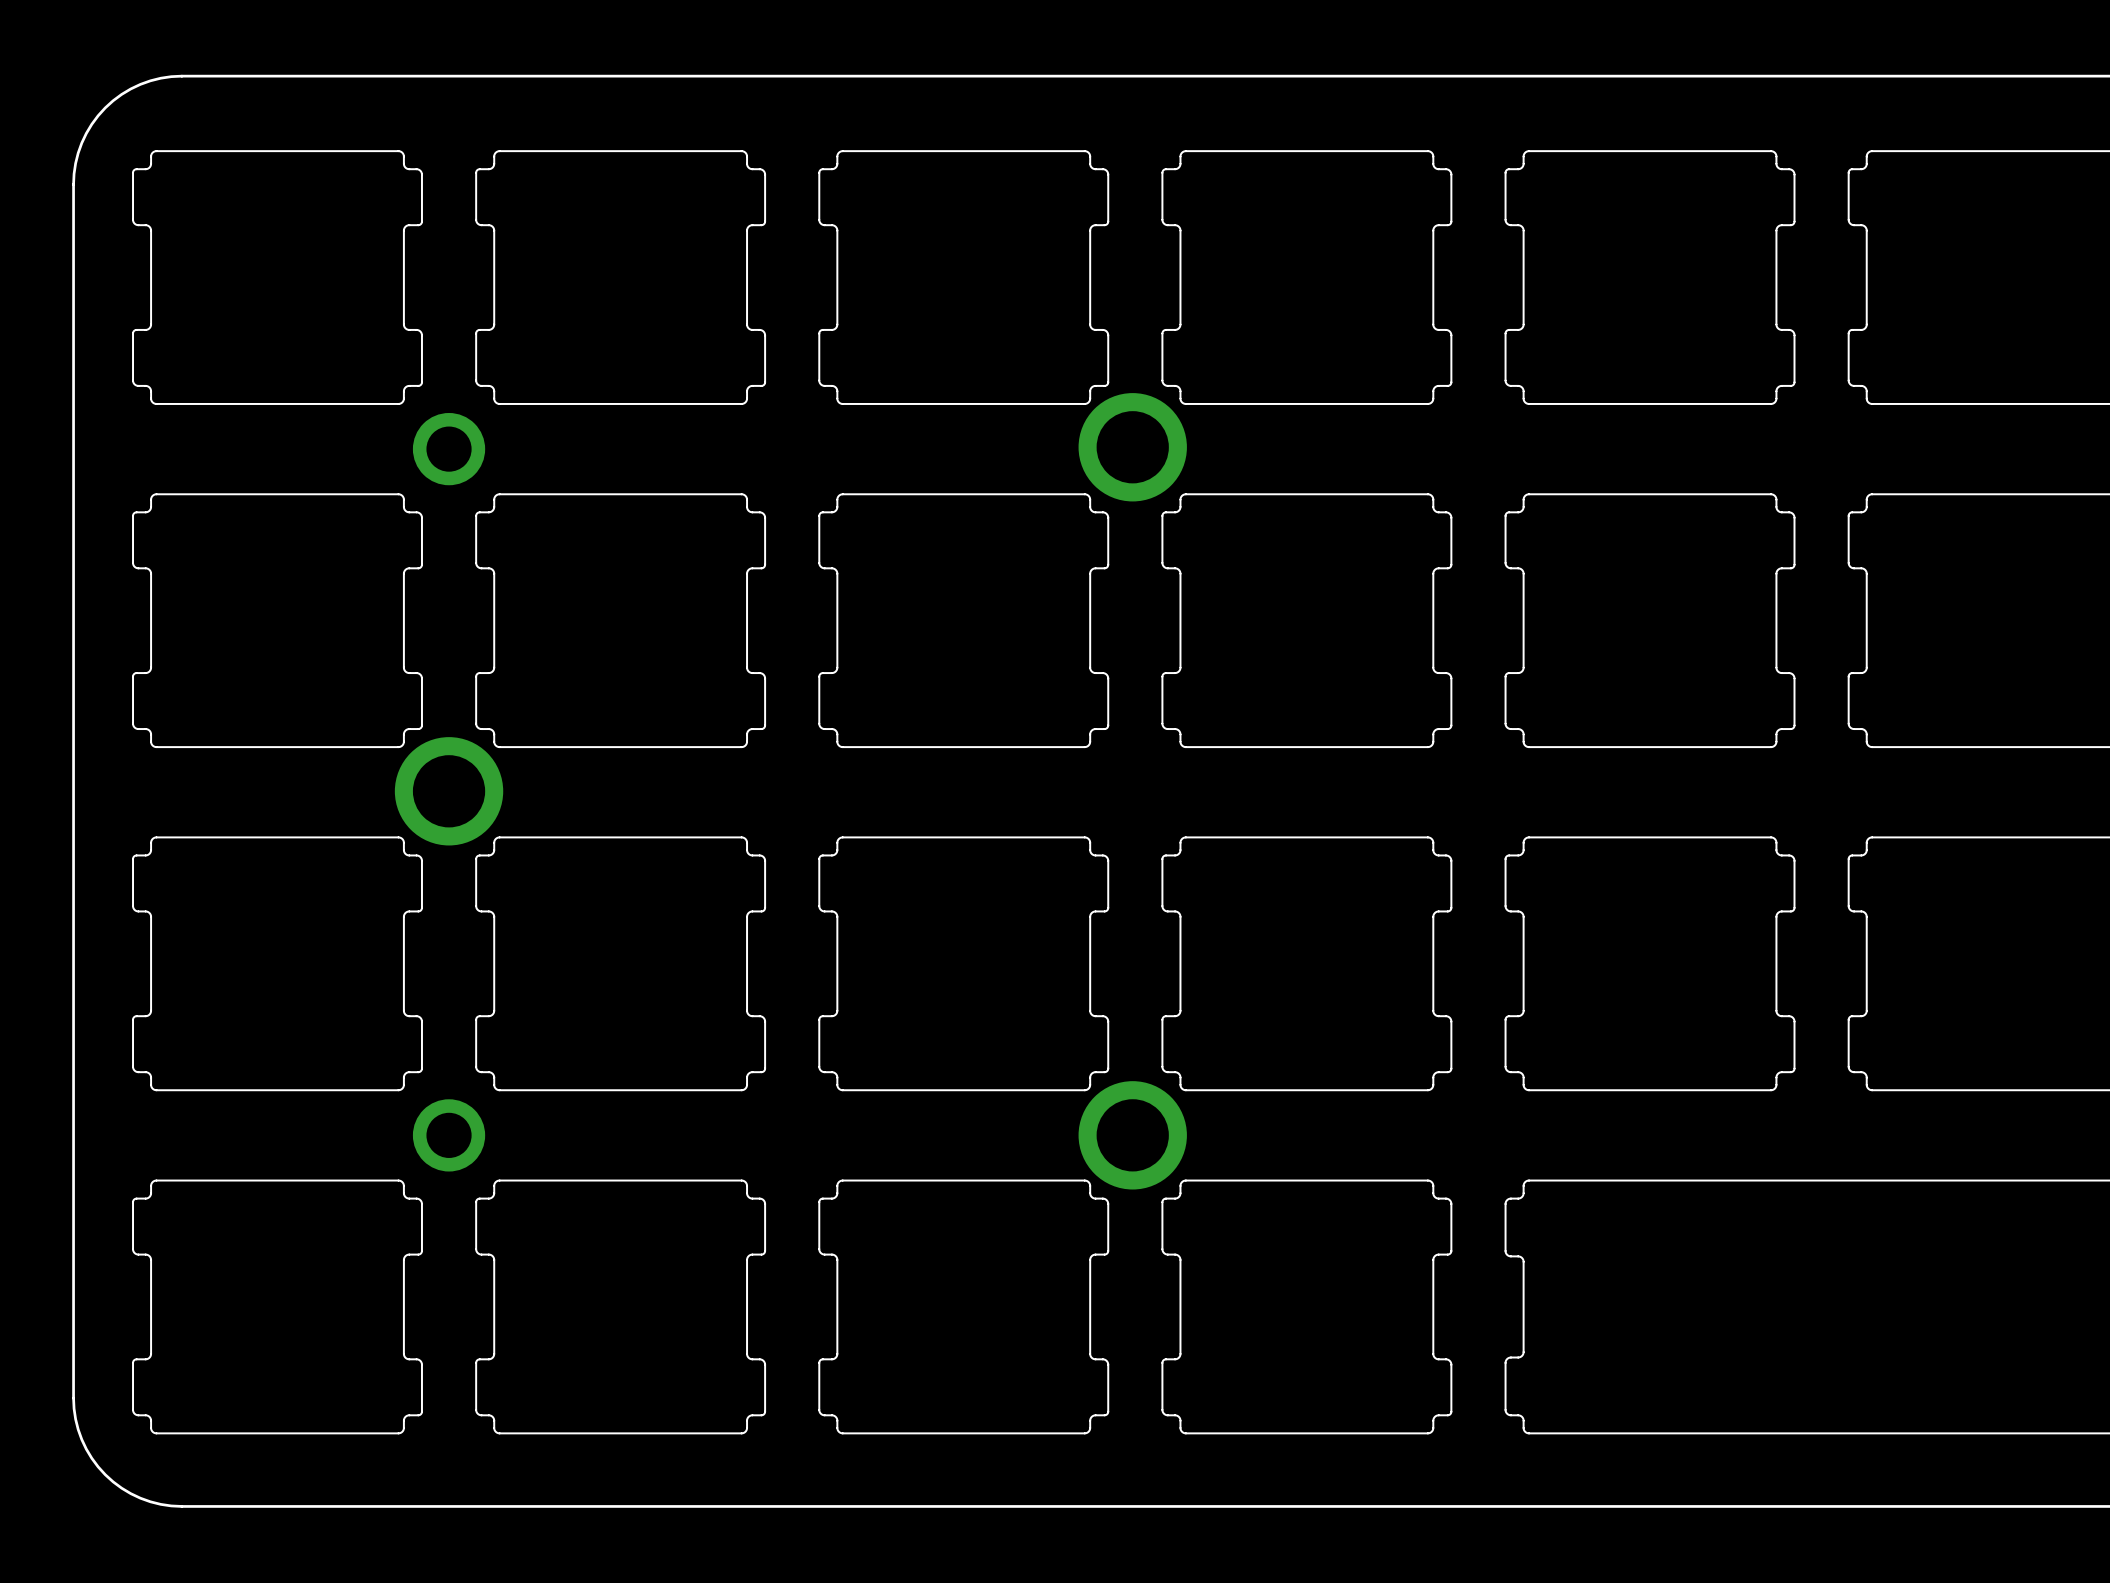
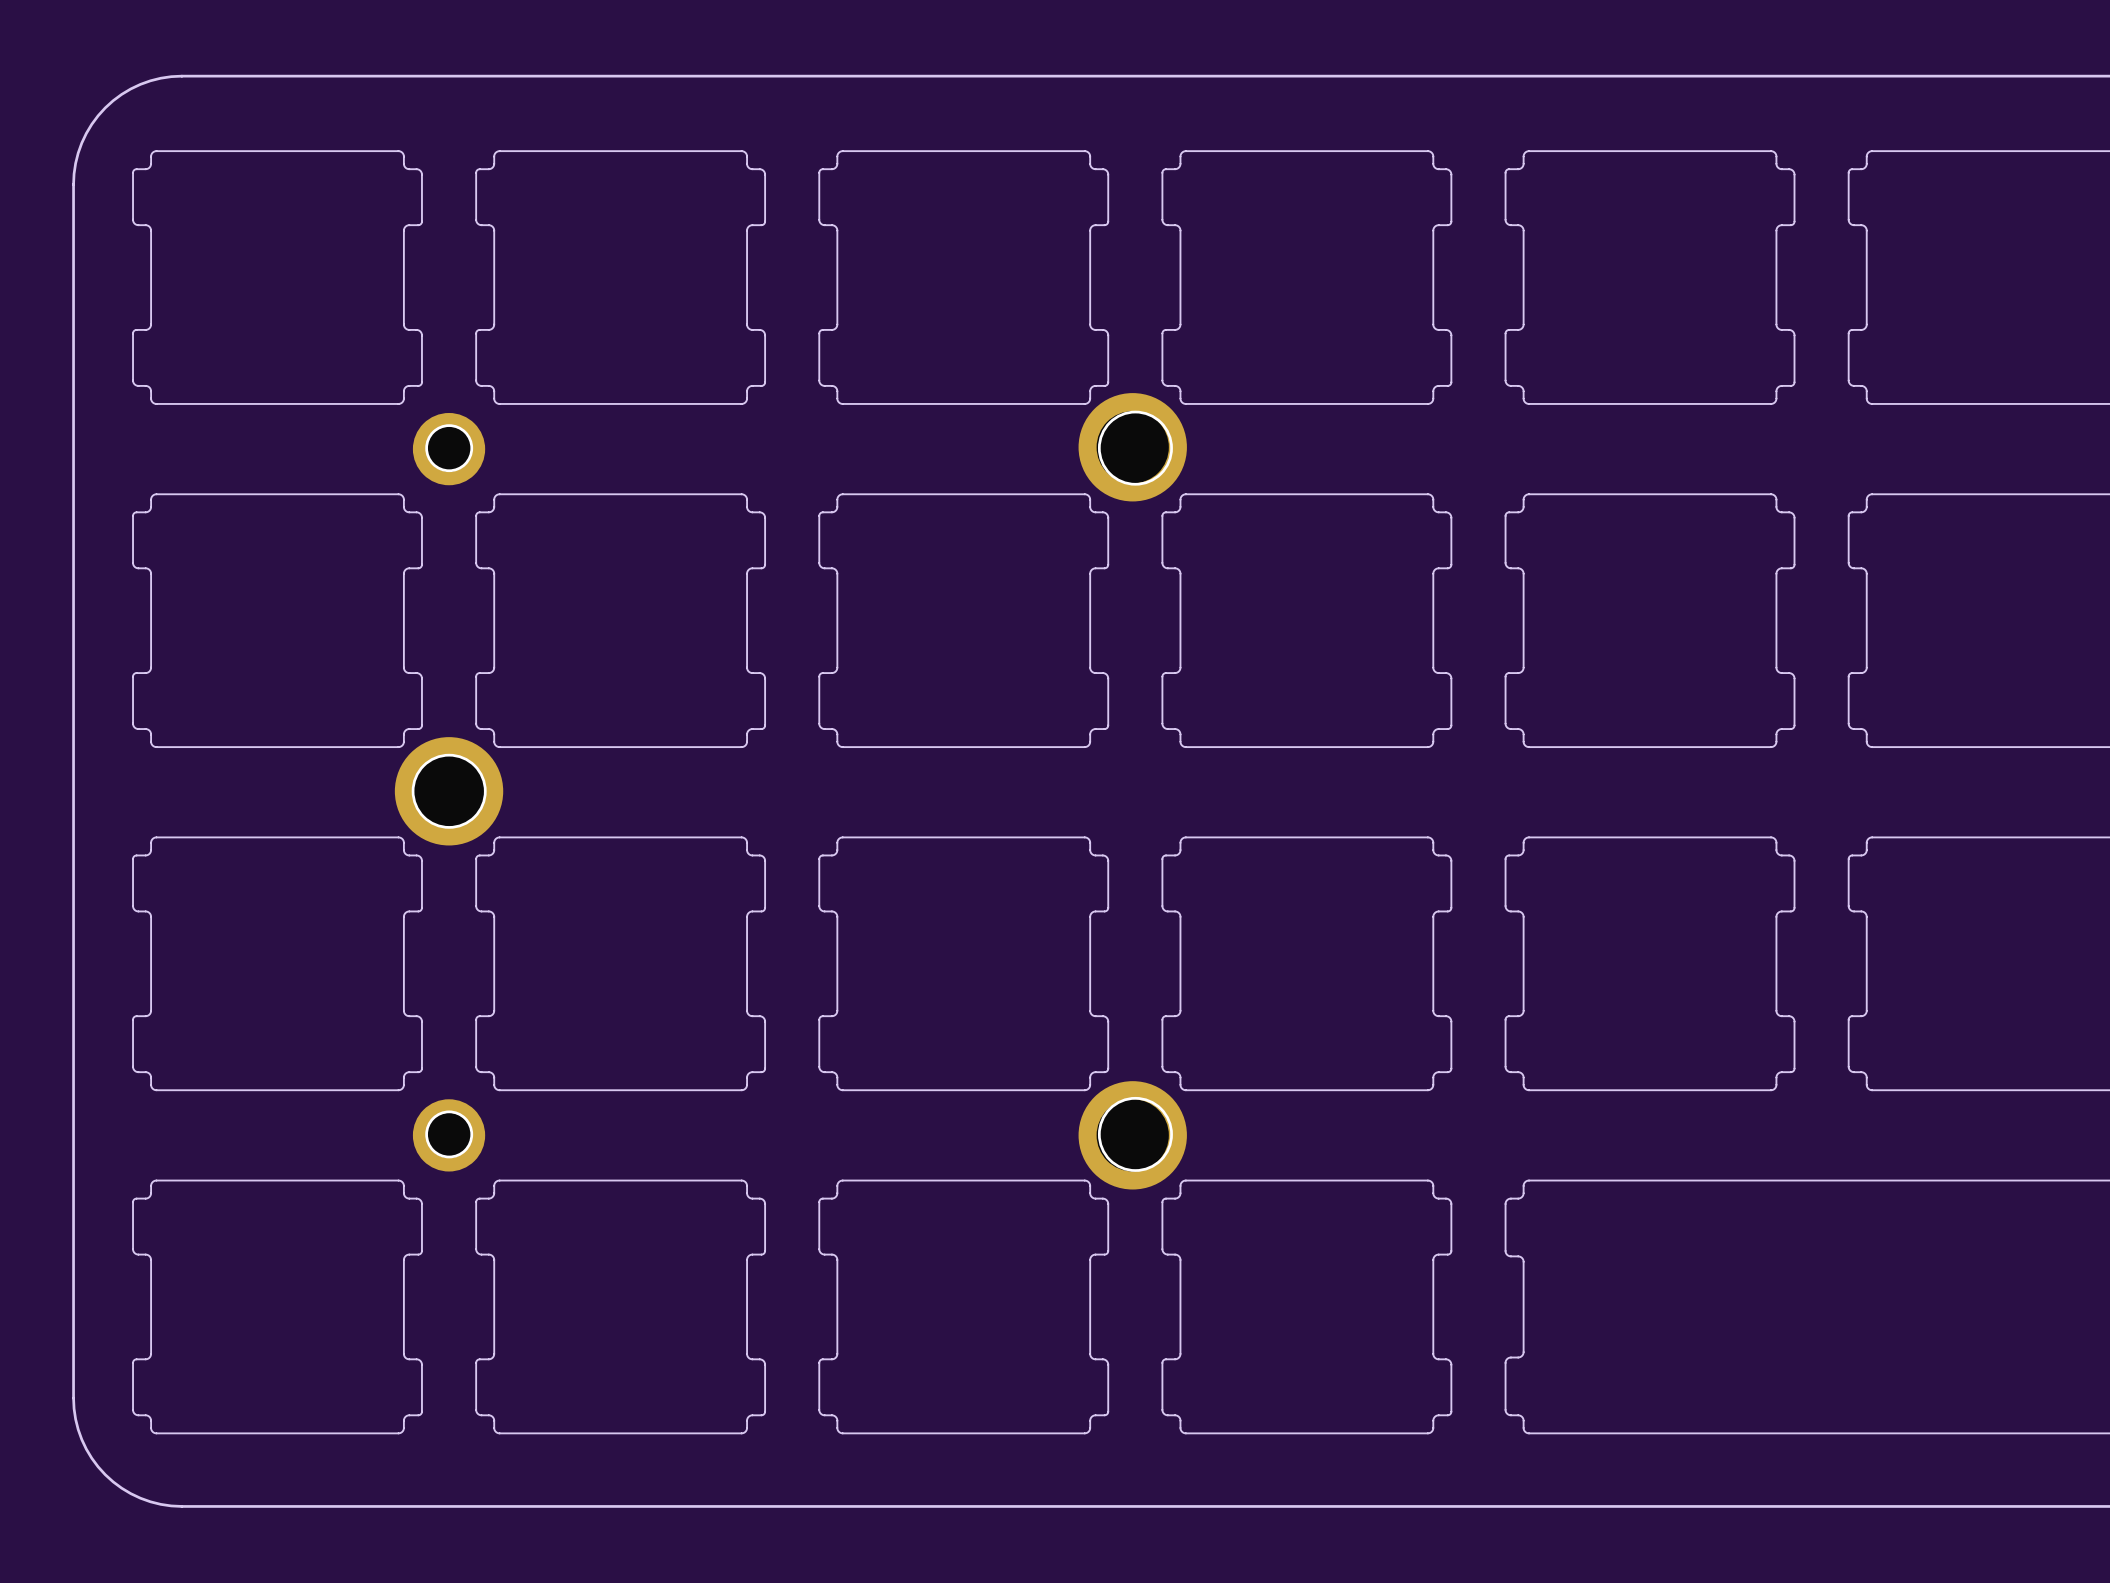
drawing: none -> [1097, 410, 1173, 486]
drawing: none -> [425, 424, 474, 473]
drawing: none -> [411, 753, 487, 829]
drawing: none -> [1097, 1096, 1173, 1172]
drawing: none -> [425, 1110, 474, 1159]

